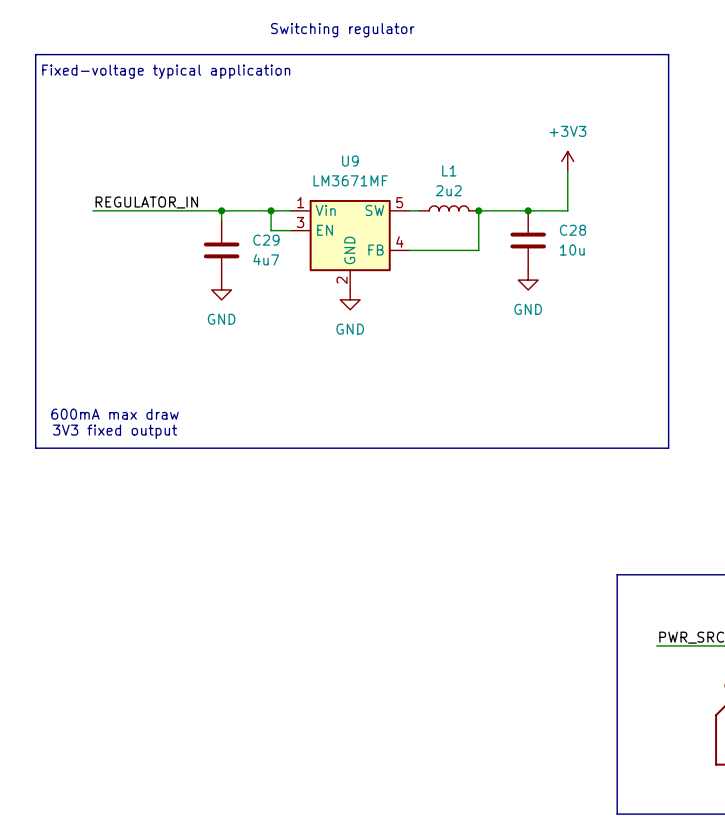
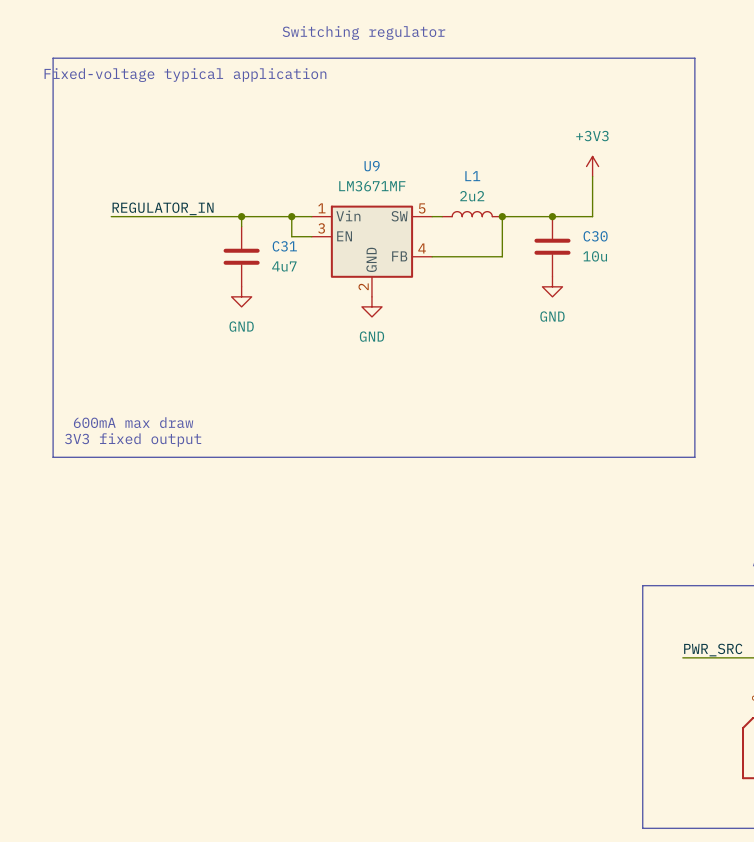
C28 name: C28 (573, 230) -> C30 (595, 236)
C29 name: C29 (266, 240) -> C31 (284, 246)

